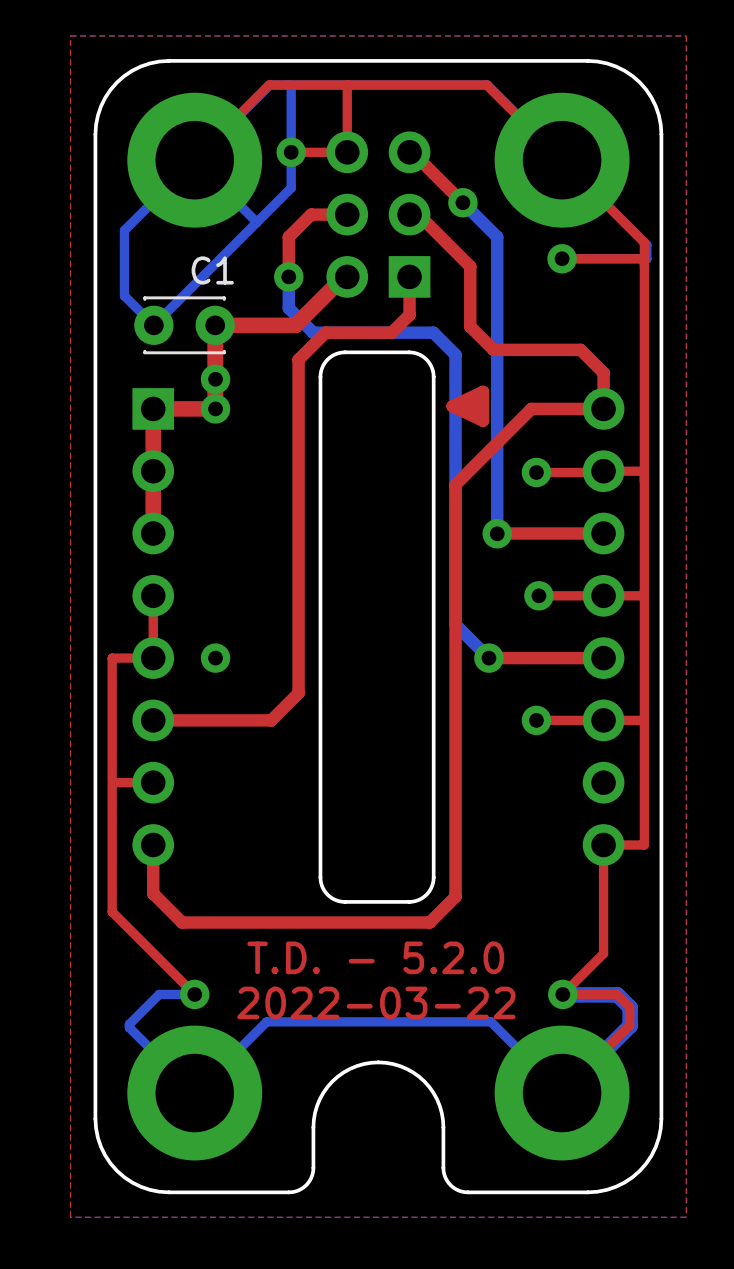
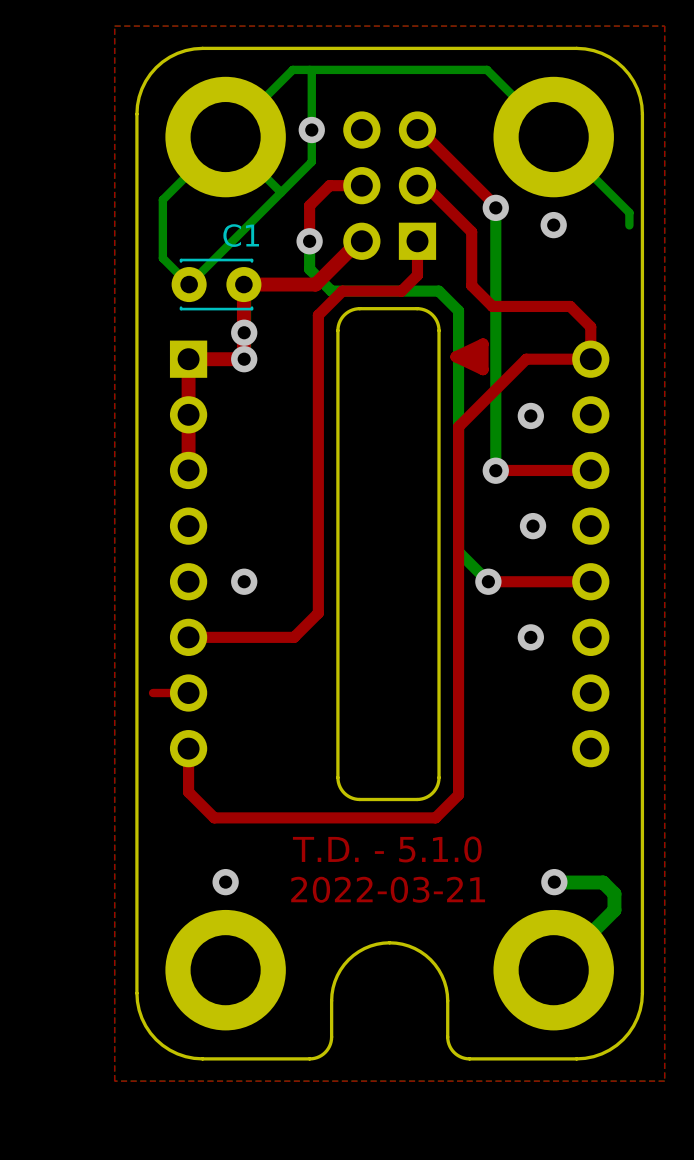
top track: (347, 84) (347, 152) (291, 152) -> none
top track: (193, 160) (269, 84) (486, 84) (561, 160) -> none
top track: (562, 160) (644, 242) (644, 722) -> none
top track: none -> (464, 175) (495, 207)
bottom track: (462, 202) (497, 237) (497, 239) -> none
via position: (462, 202) -> (495, 207)
top track: (562, 258) (642, 258) -> none
top track: (643, 471) (536, 472) -> none
top track: (153, 595) (153, 658) (112, 658) (112, 781) -> none
top track: (538, 595) (641, 595) -> none
top track: (536, 720) (641, 720) -> none
top track: (644, 723) (644, 844) -> none
top track: (112, 783) (112, 911) (194, 994) -> none
top track: (644, 844) (603, 844) (603, 953) (562, 994) (616, 994) (629, 1007) (629, 1025) (562, 1093) -> none
text: T.D. - 5.2.0 (375, 957) -> T.D. - 5.1.0 (387, 849)
bottom track: (194, 994) (159, 994) (129, 1024) (129, 1027) (194, 1093) (266, 1021) (490, 1021) (562, 1093) -> none
text: 2022-03-22 (376, 1002) -> 2022-03-21 (388, 889)

